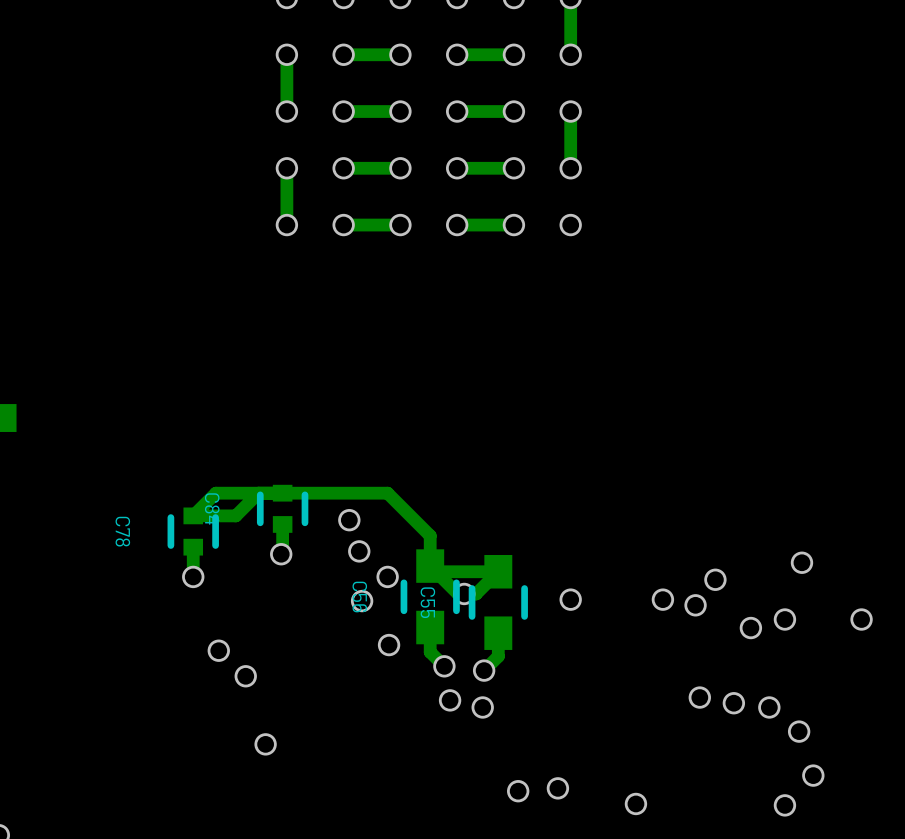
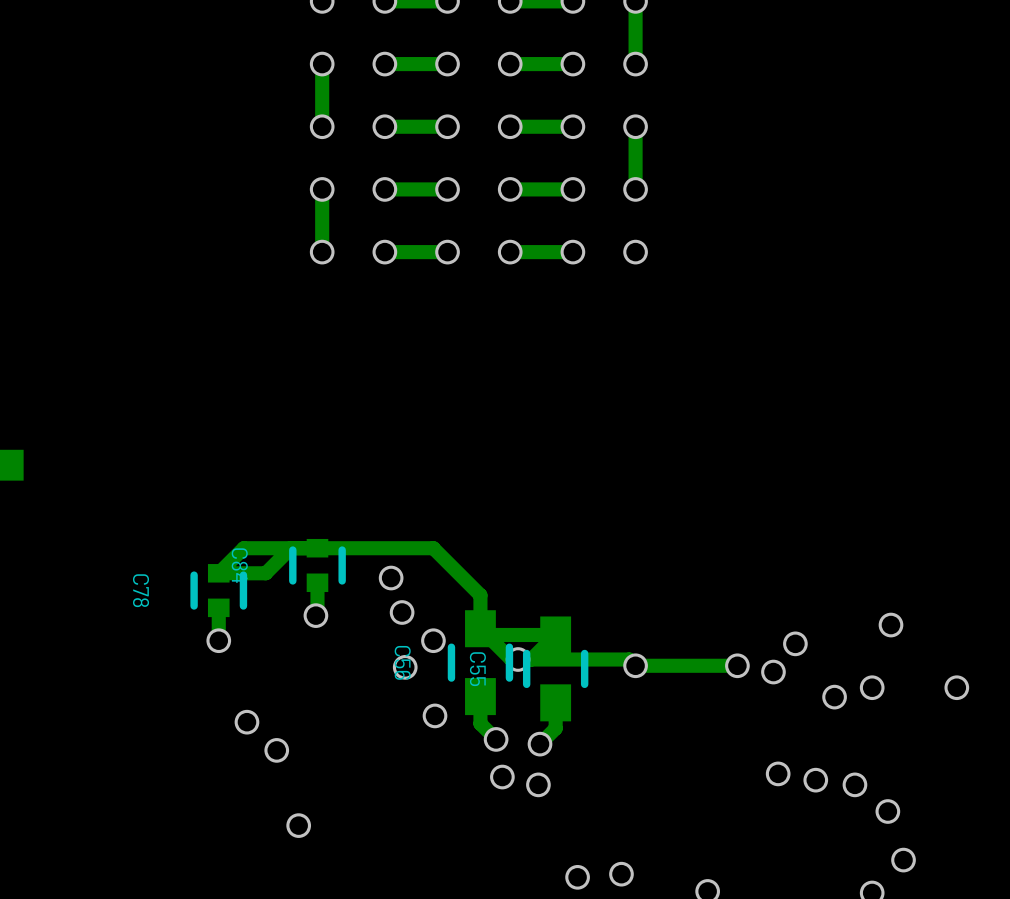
track: none -> (531, 659) (629, 659) (635, 665) (737, 665)

